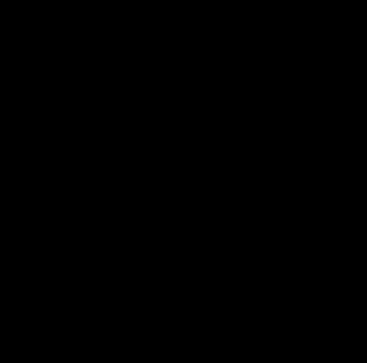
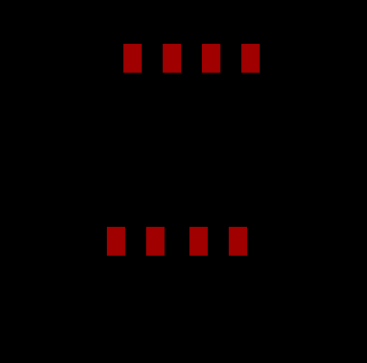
part: none -> (152, 58)
part: none -> (230, 58)
part: none -> (135, 241)
part: none -> (218, 241)

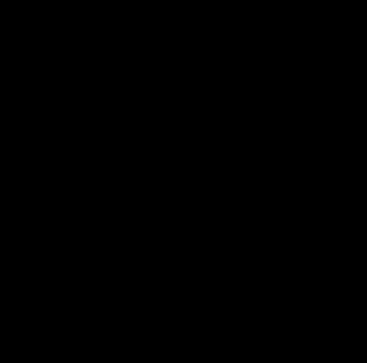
part: (152, 58) -> none
part: (230, 58) -> none
part: (135, 241) -> none
part: (218, 241) -> none

